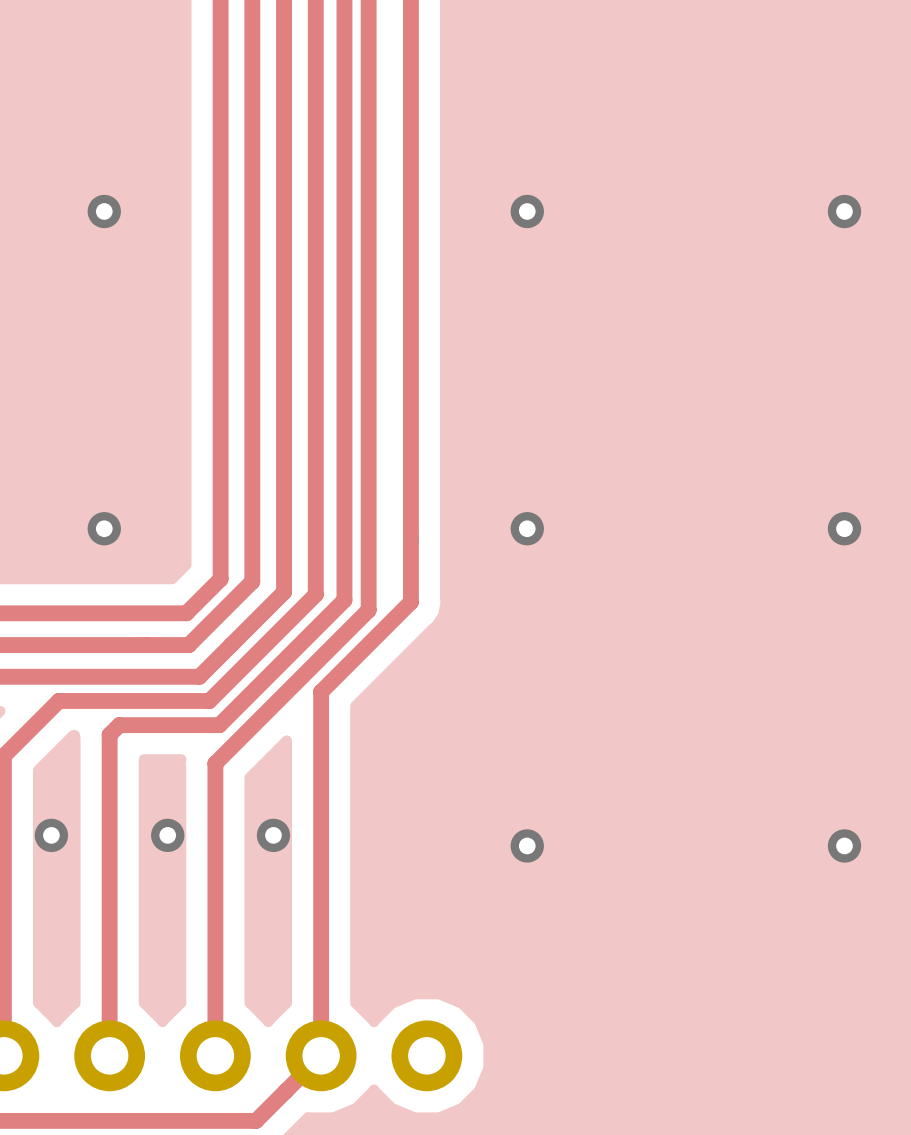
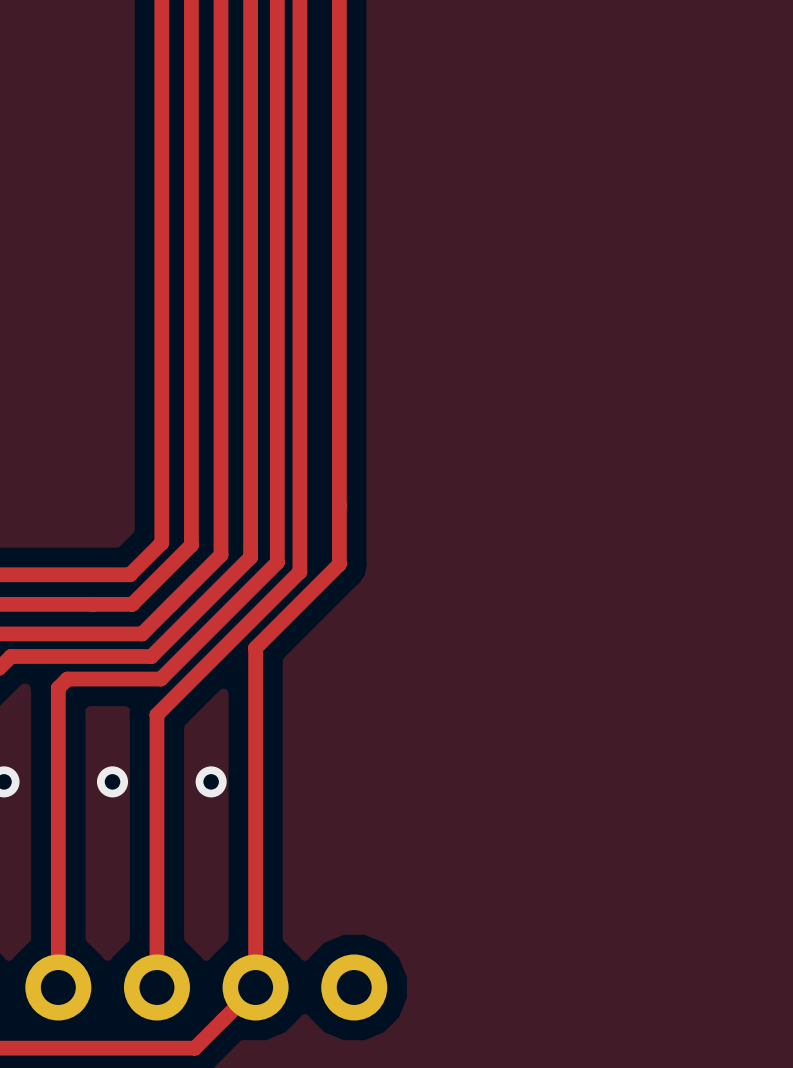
via: (104, 211) -> none
via: (527, 211) -> none
via: (844, 211) -> none
via: (104, 528) -> none
via: (527, 528) -> none
via: (844, 528) -> none
via: (527, 845) -> none
via: (844, 845) -> none

